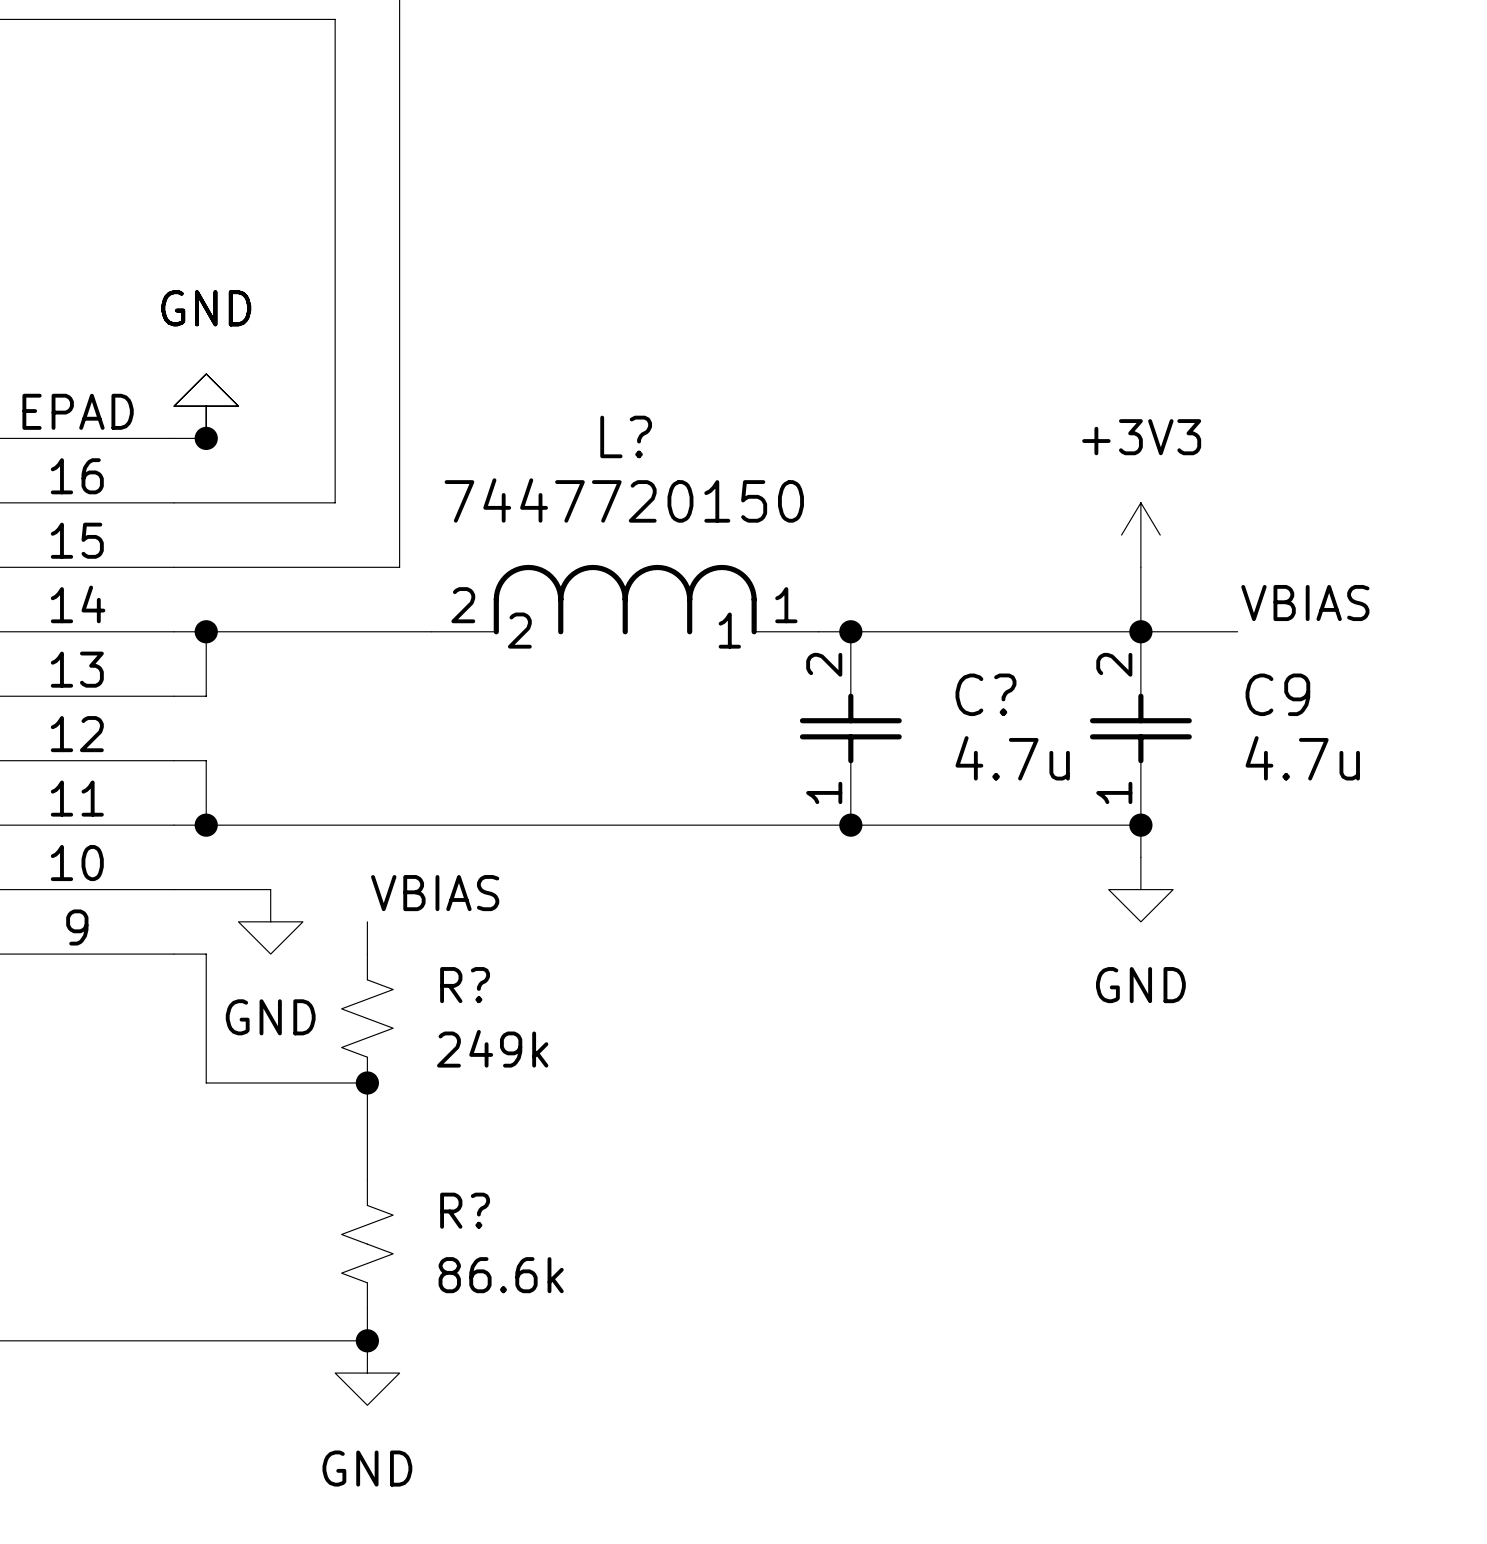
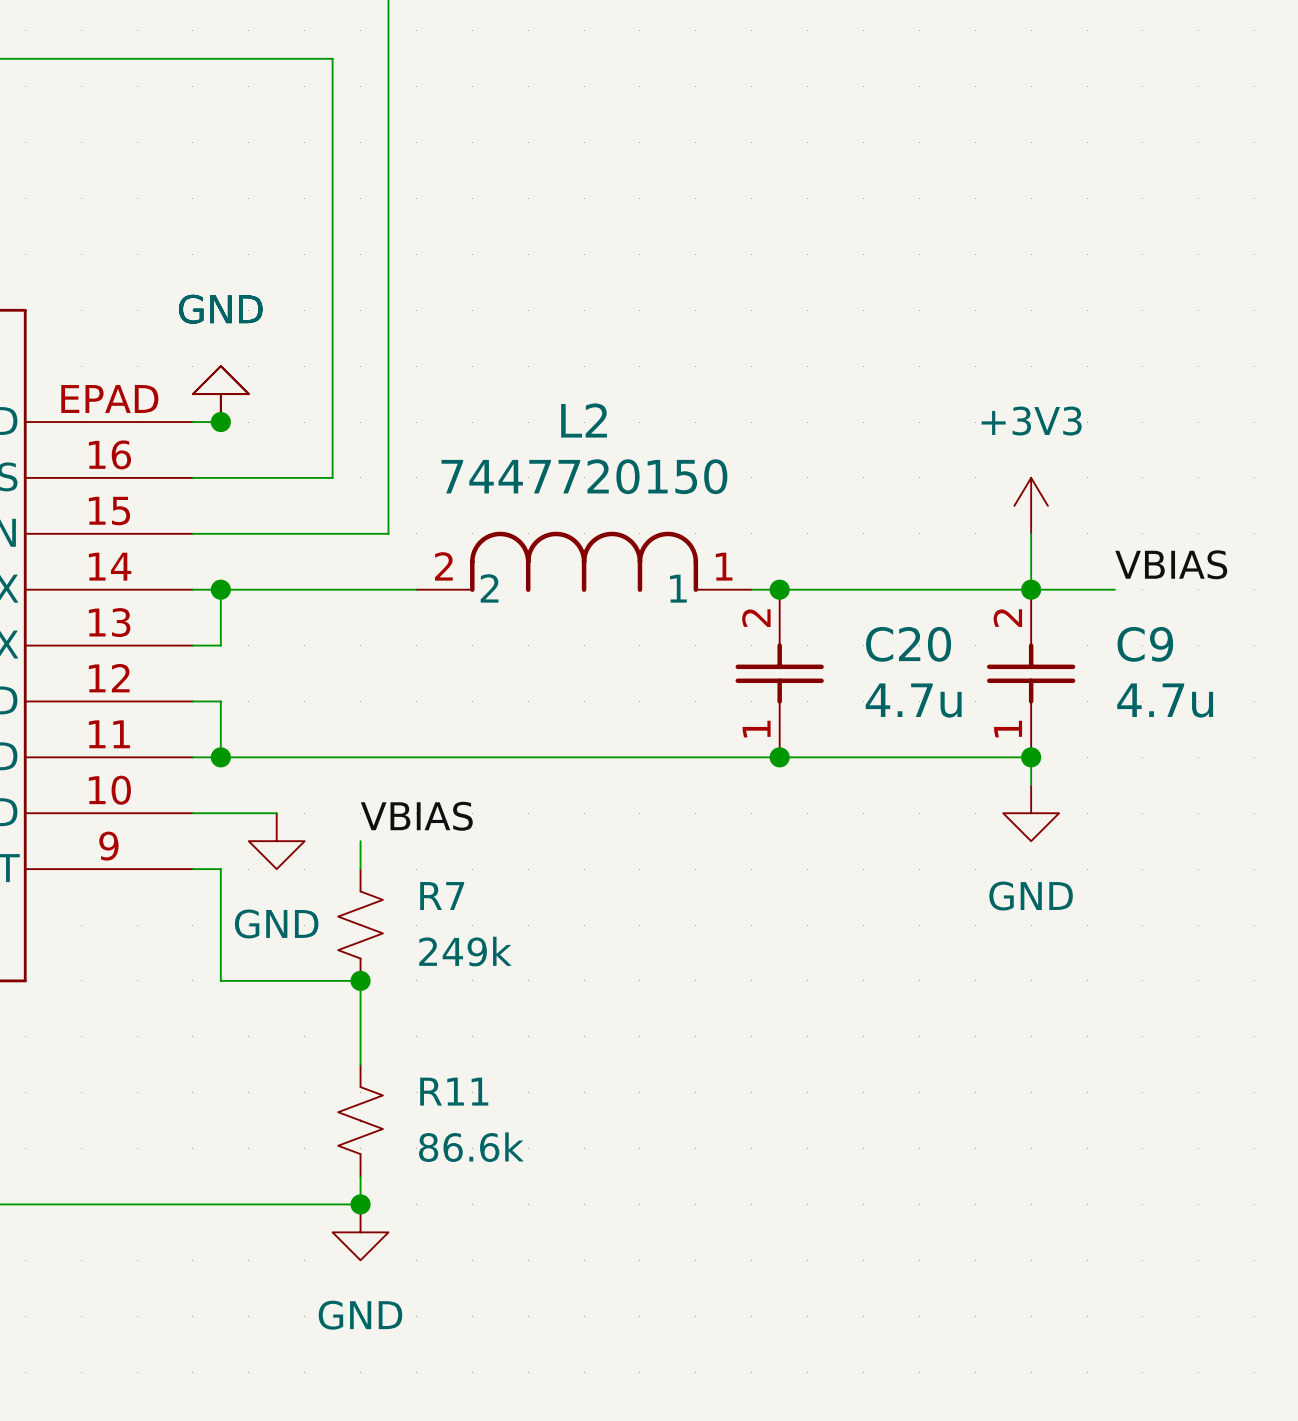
L? name: L? (626, 436) -> L2 (584, 420)
C? name: C? (985, 694) -> C20 (908, 644)
R? name: R? (465, 985) -> R7 (442, 896)
R? name: R? (465, 1210) -> R11 (454, 1091)

